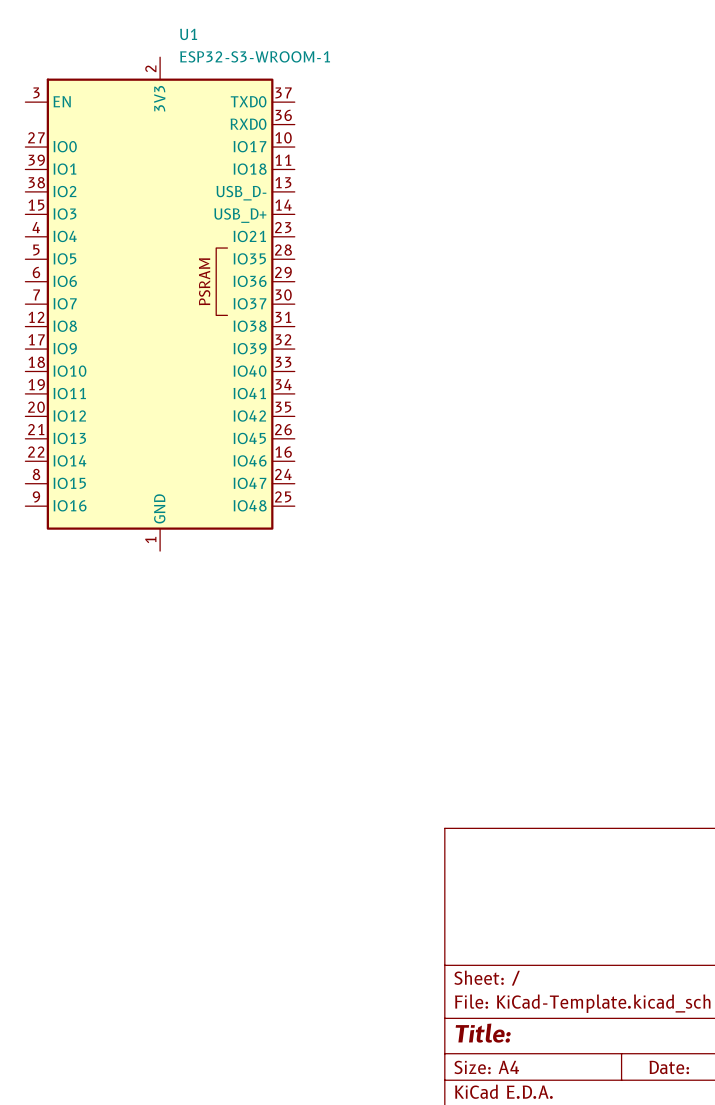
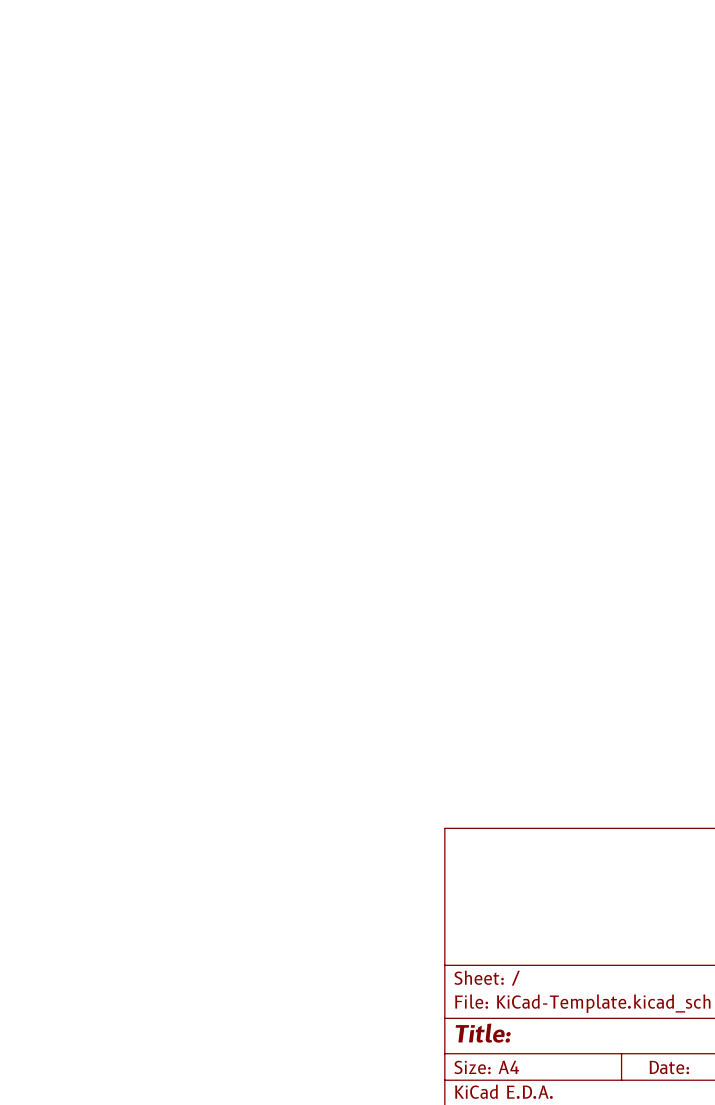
U1: ESP32-S3-WROOM-1 (160, 304) -> none

